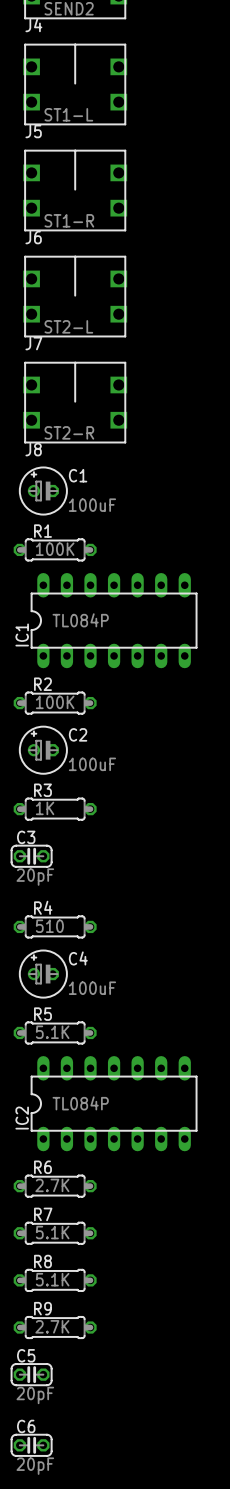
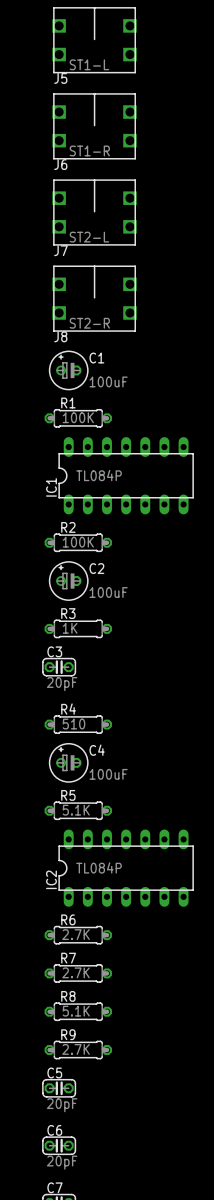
R7 value: 5.1K (52, 1232) -> 2.7K (76, 972)

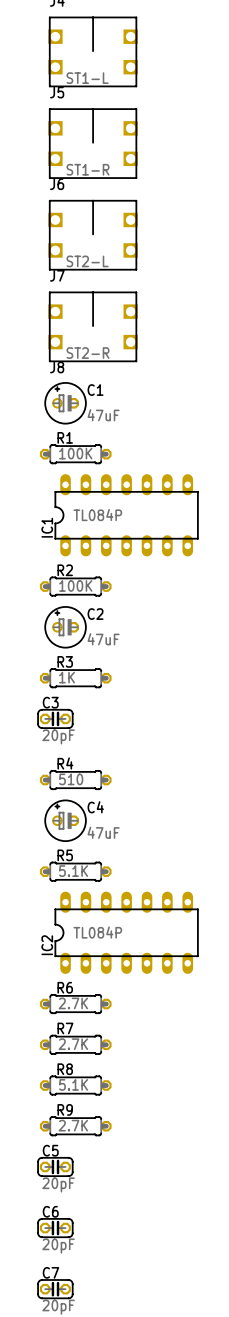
C1 value: 100uF (108, 381) -> 47uF (103, 415)
C2 value: 100uF (108, 592) -> 47uF (103, 639)
C4 value: 100uF (108, 774) -> 47uF (103, 832)

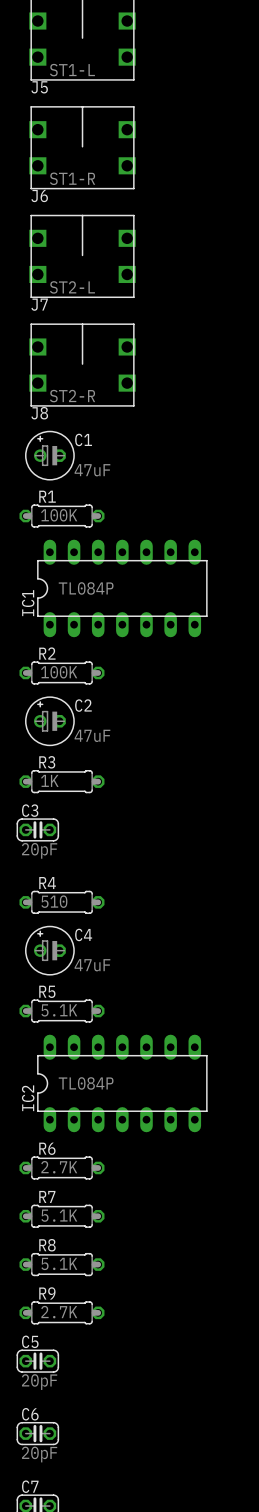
R7 value: 2.7K (73, 1044) -> 5.1K (59, 1215)

